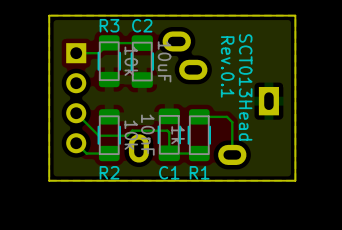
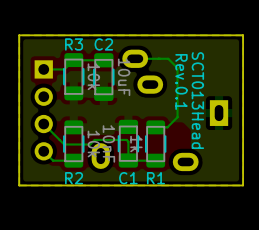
bottom track: (212, 116) (226, 116) (232, 122) (232, 154) -> (167, 127) (177, 117) (177, 68) (168, 58) (135, 58)

